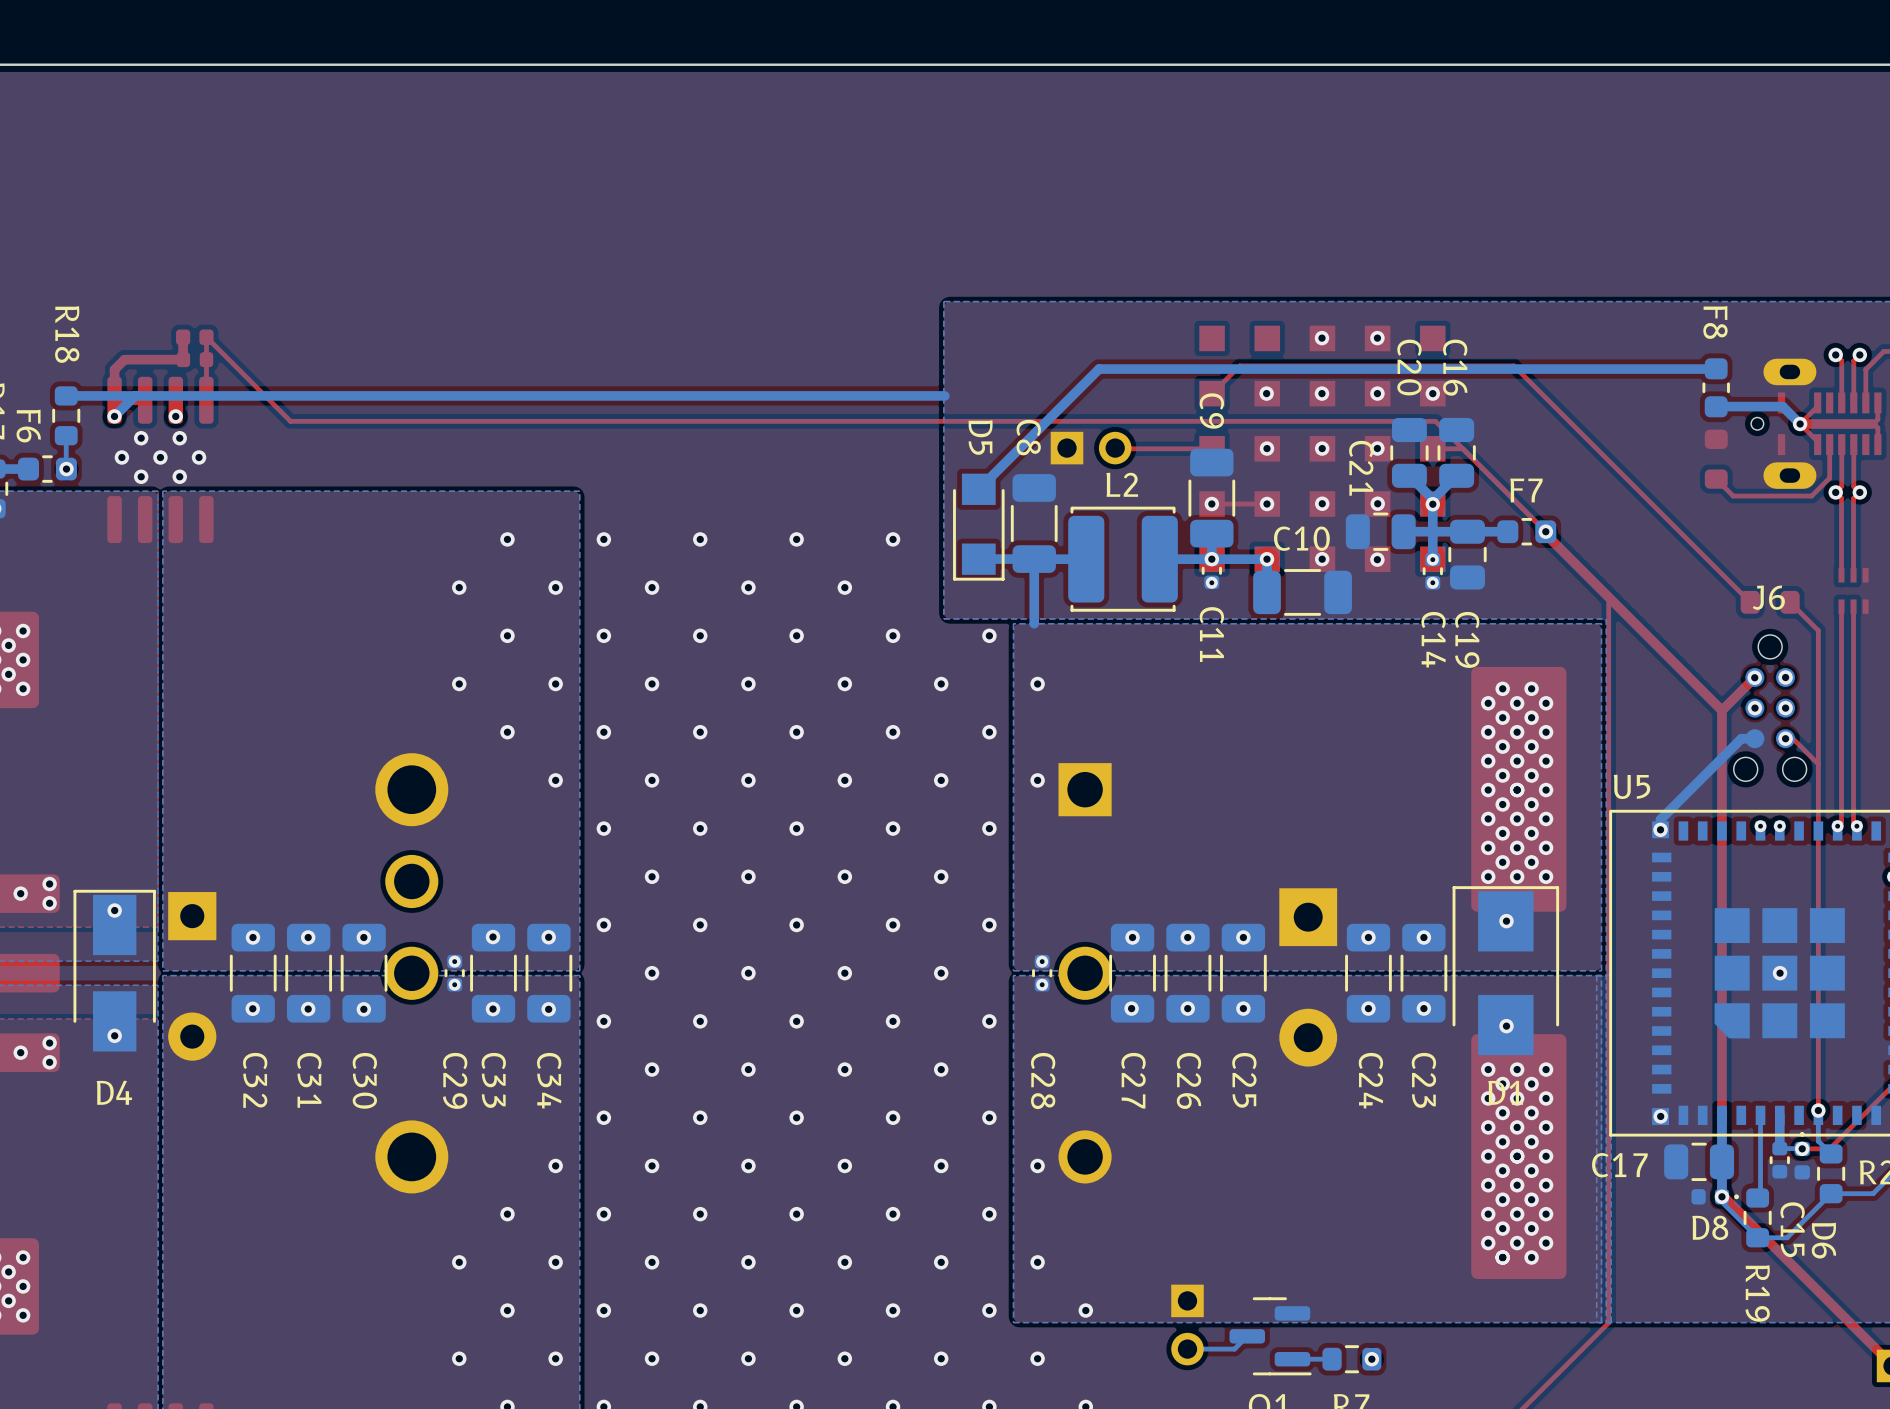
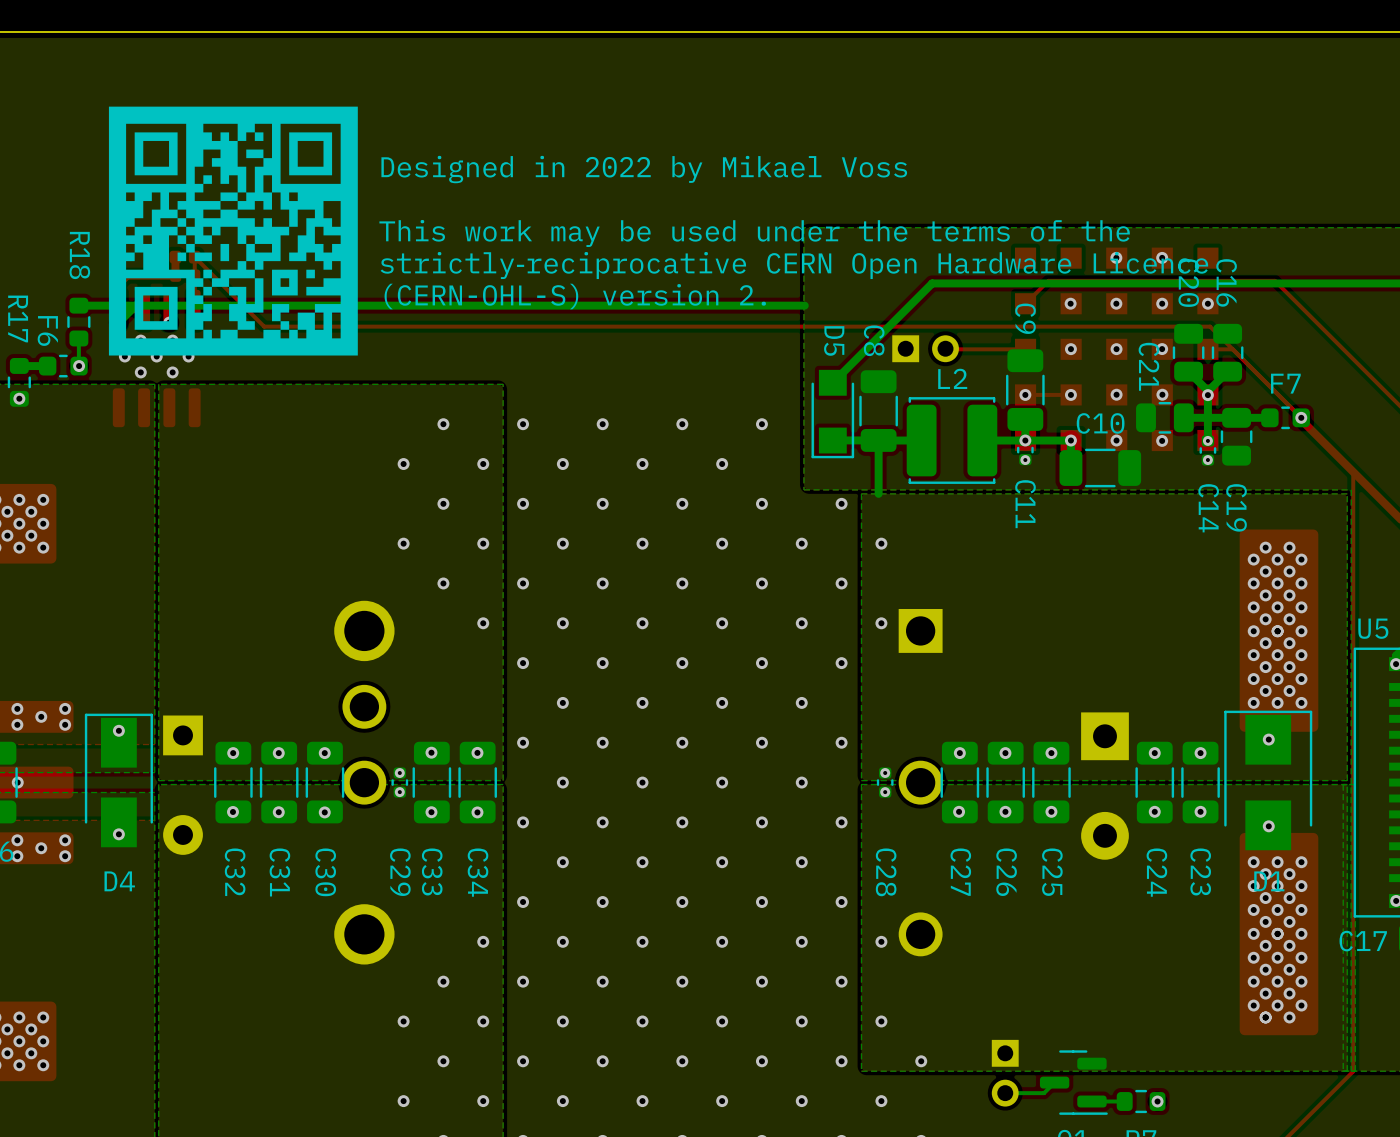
drawing: none -> [108, 106, 358, 356]
text: none -> Designed in 2022 by Mikael Voss (644, 169)
text: none -> This work may be used under the terms of the (754, 233)
text: none -> strictly‐reciprocative CERN Open Hardware Licence (794, 265)
text: none -> (CERN-OHL-S) version 2. (575, 296)

